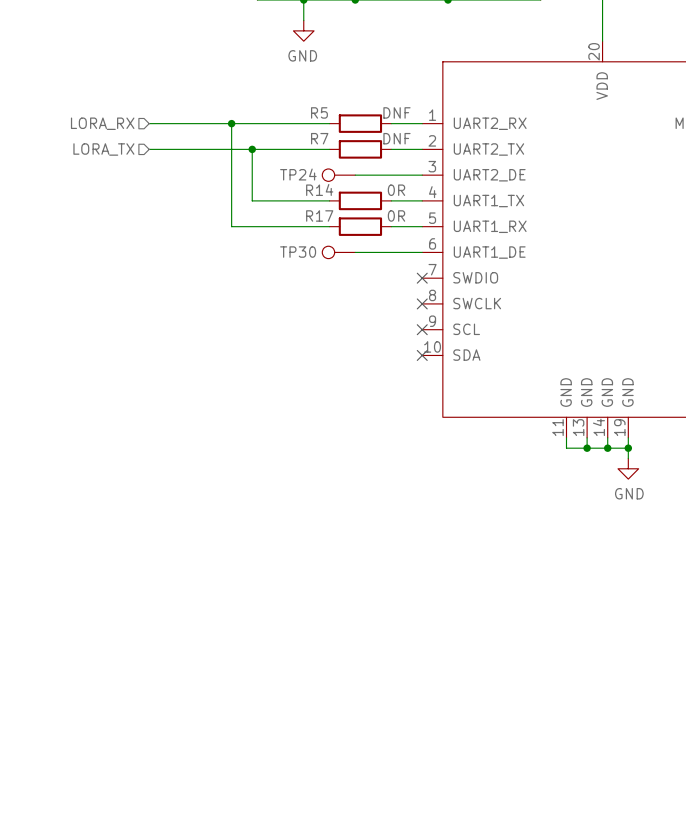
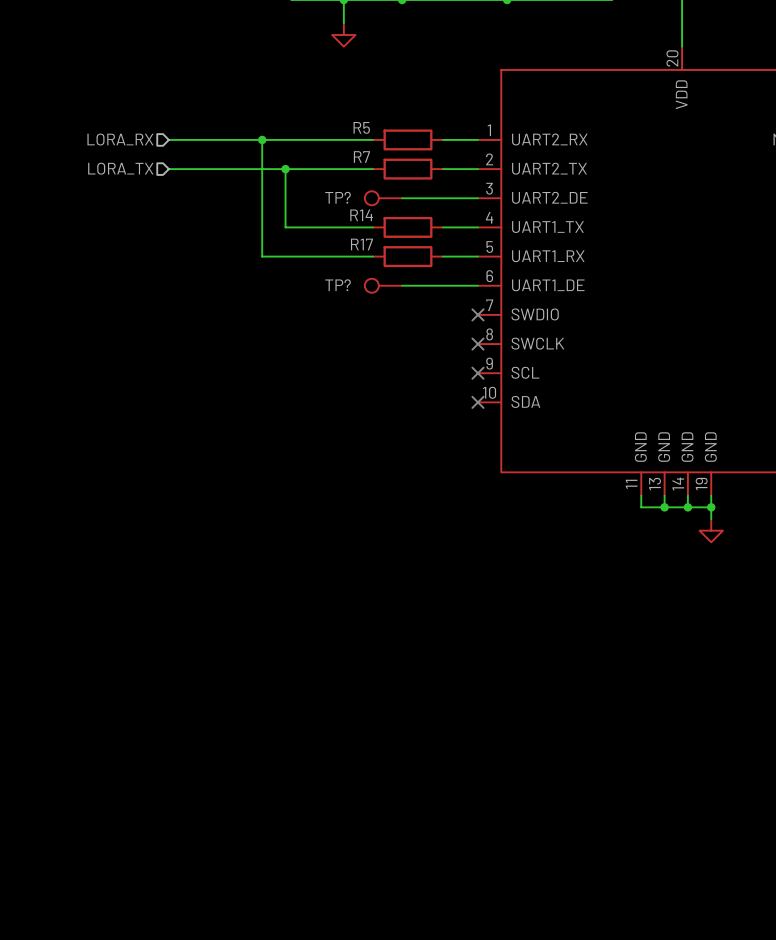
power symbol text: GND (302, 55) -> none
R5 value: DNF (396, 112) -> none
R7 value: DNF (396, 138) -> none
TP24 name: TP24 (298, 174) -> TP? (338, 197)
R14 value: 0R (396, 190) -> none
R17 value: 0R (396, 215) -> none
TP30 name: TP30 (298, 252) -> TP? (338, 285)
power symbol text: GND (629, 493) -> none

